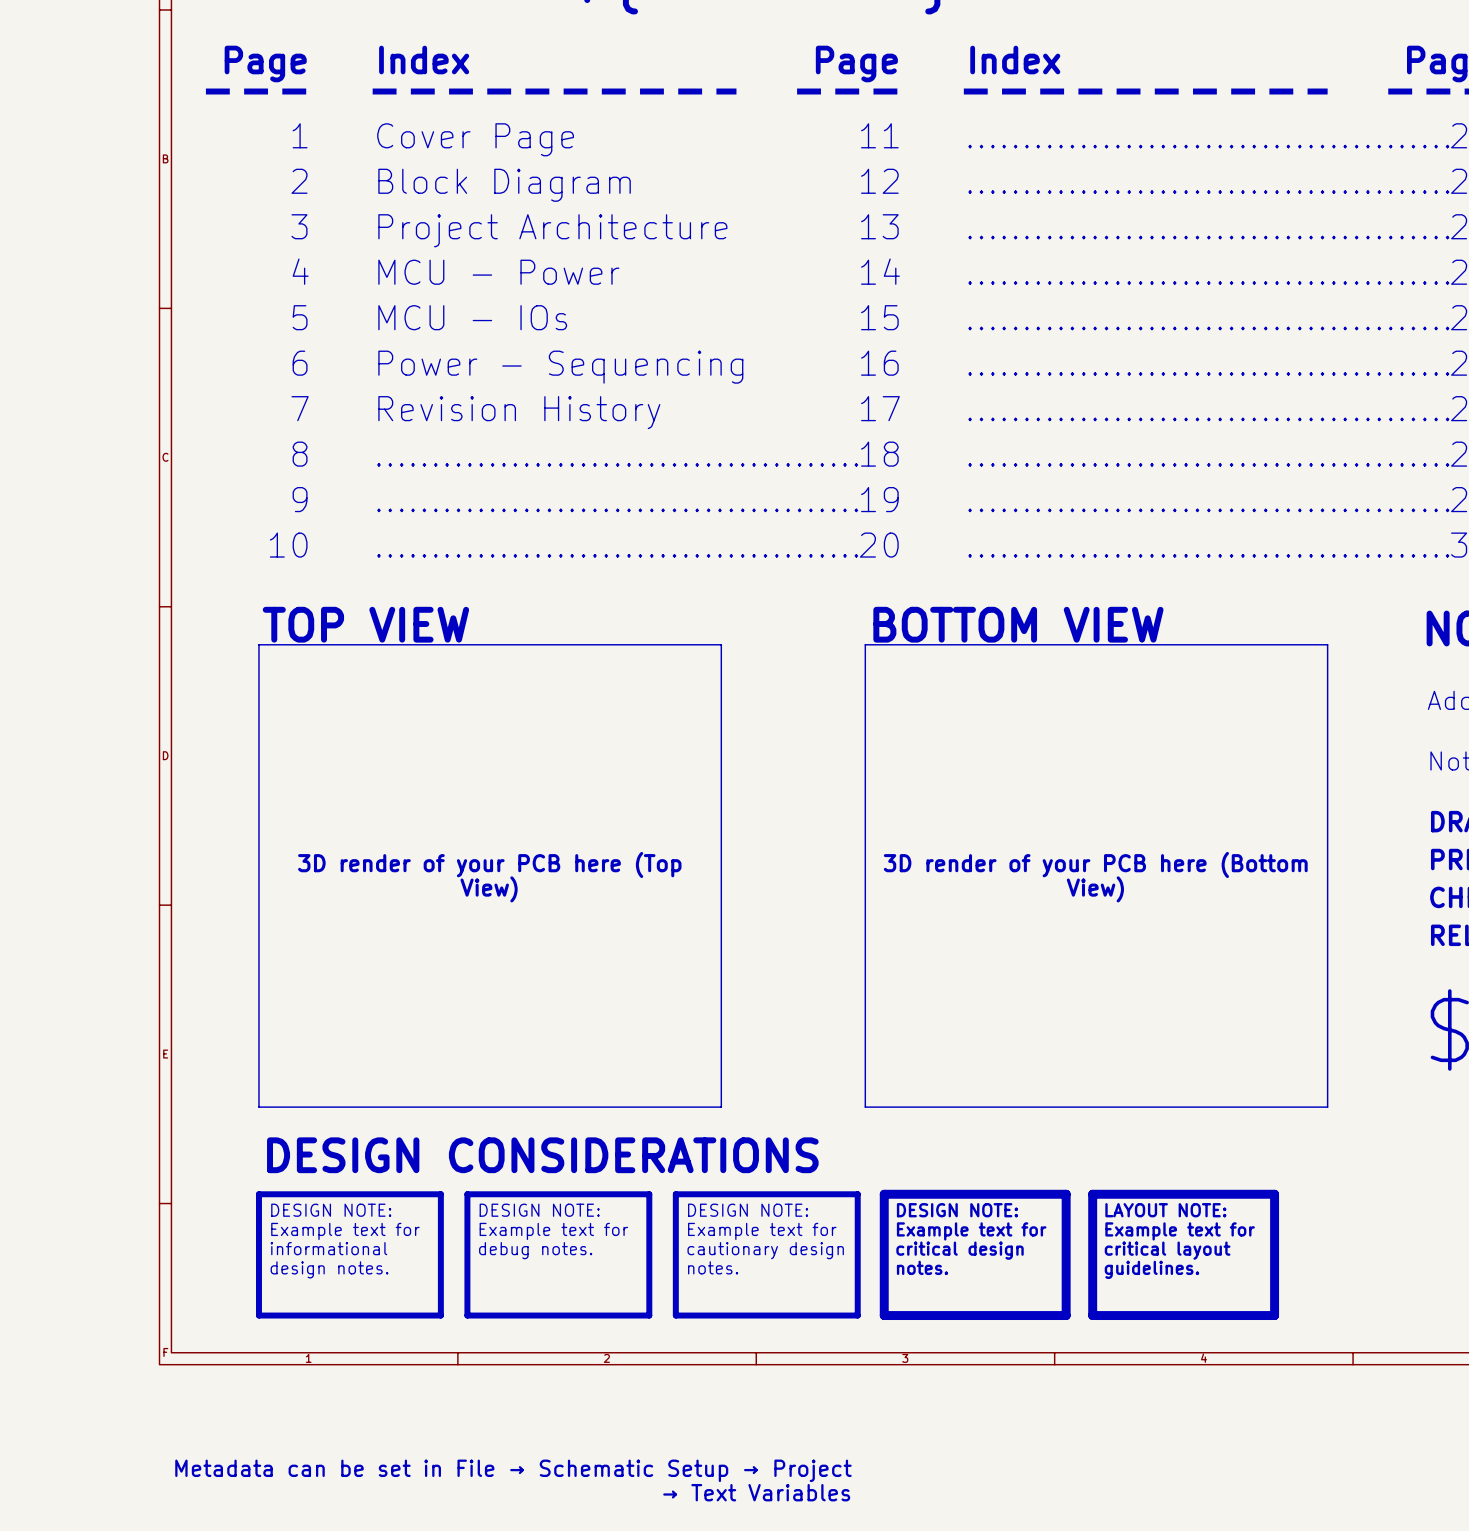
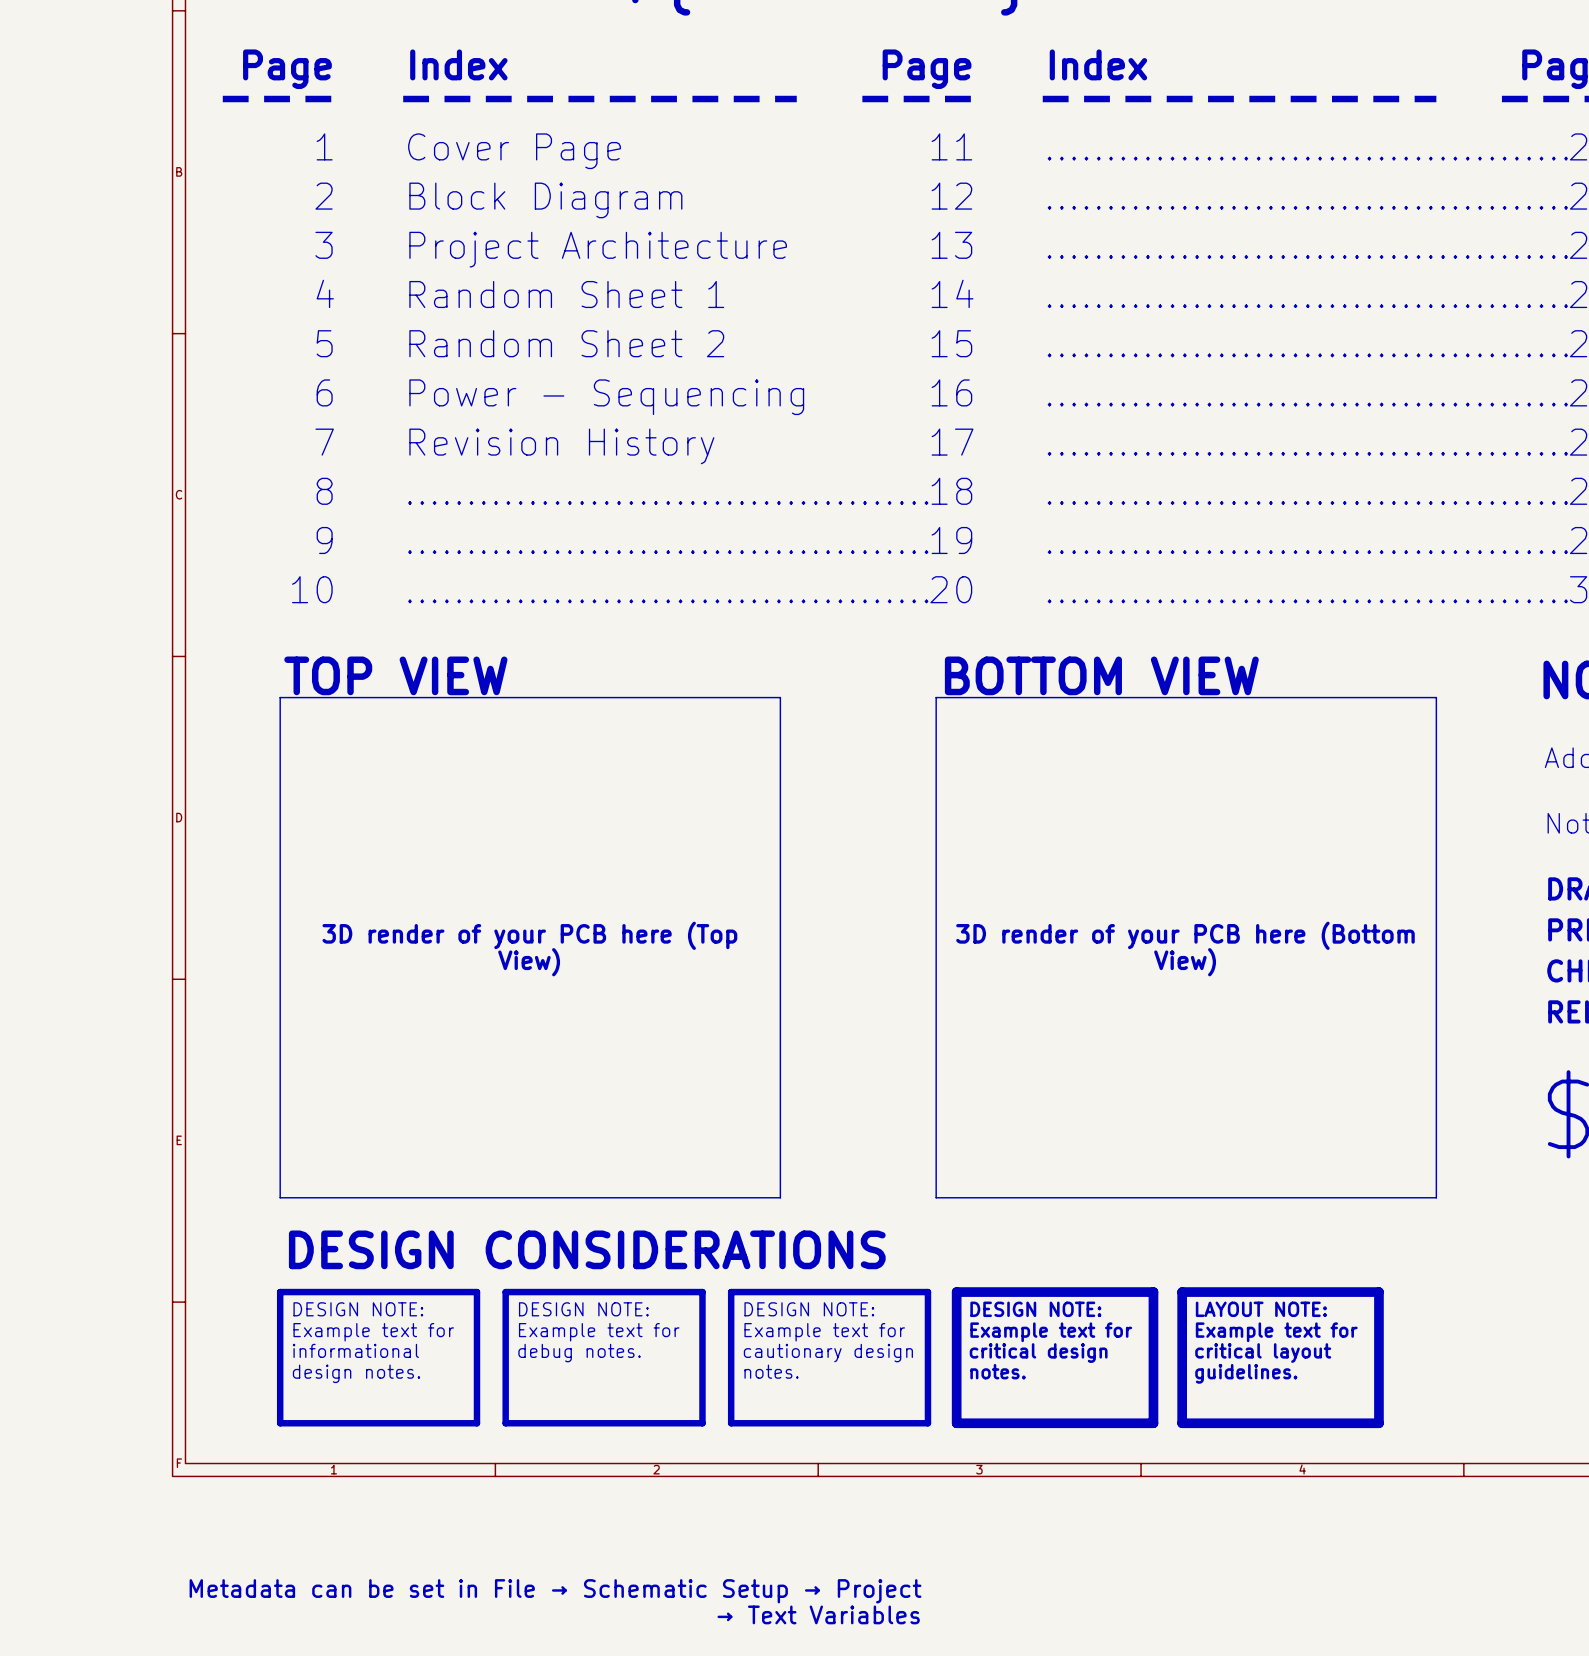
text: MCU - Power (498, 272) -> Random Sheet 1 (566, 294)
text: MCU - IOs (472, 317) -> Random Sheet 2 (566, 343)

